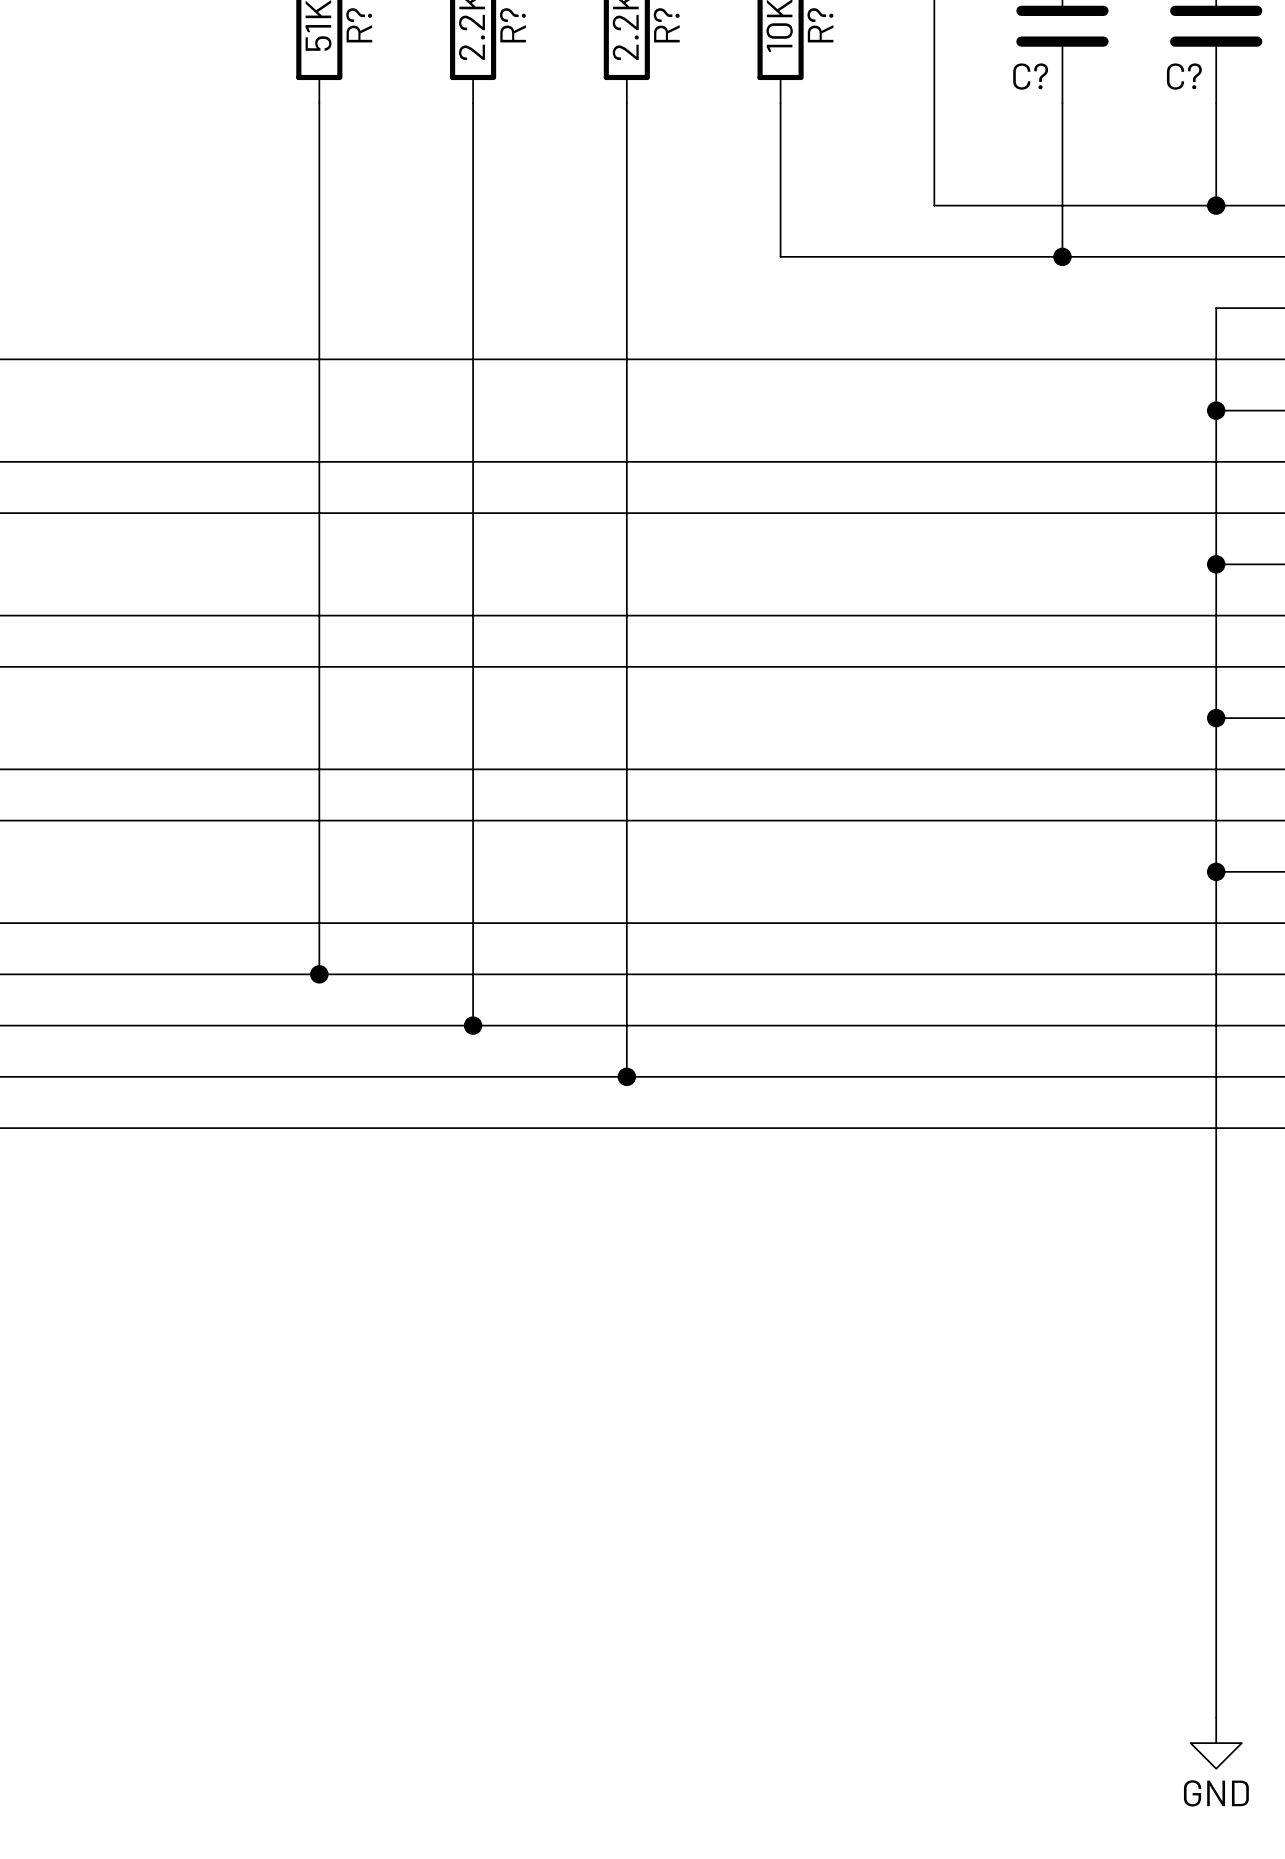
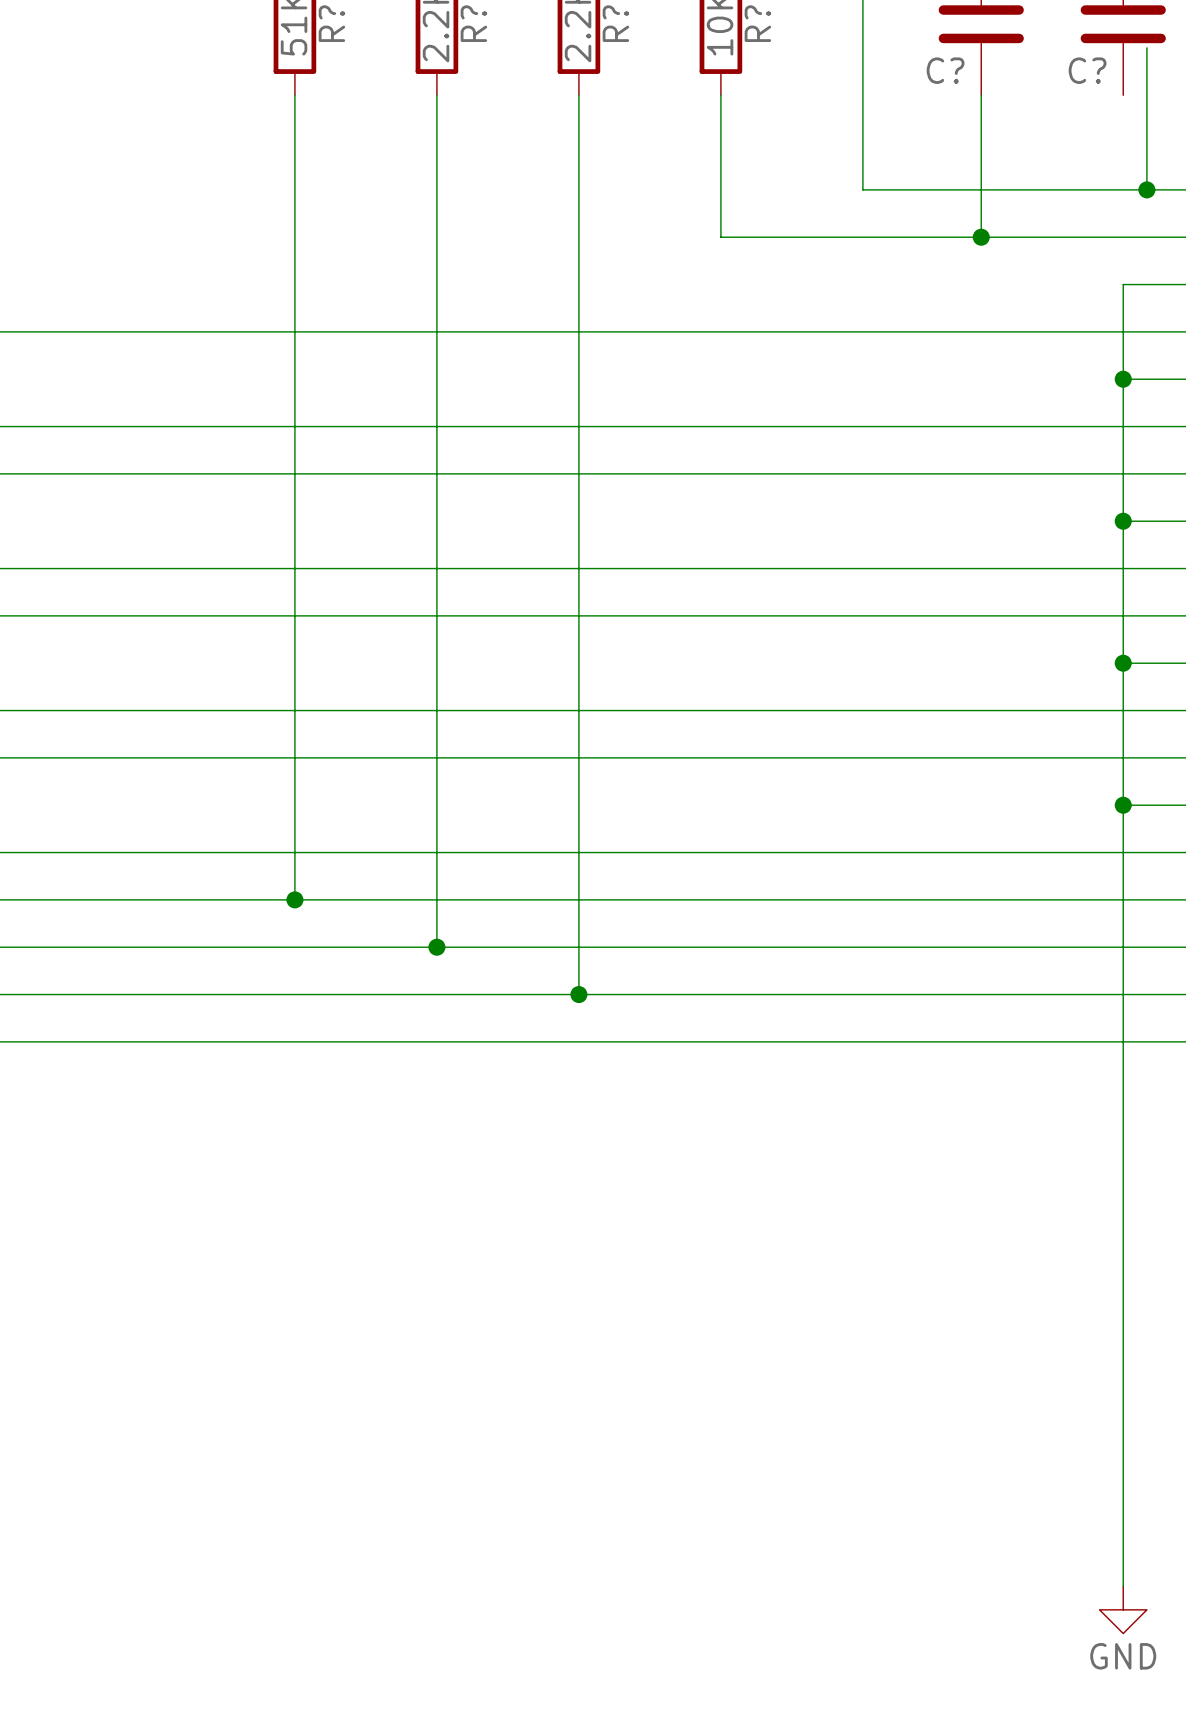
wire: none -> (1146, 47) (1146, 189)
wire: (1216, 103) (1216, 205) -> none
junction position: (1216, 205) -> (1146, 189)

